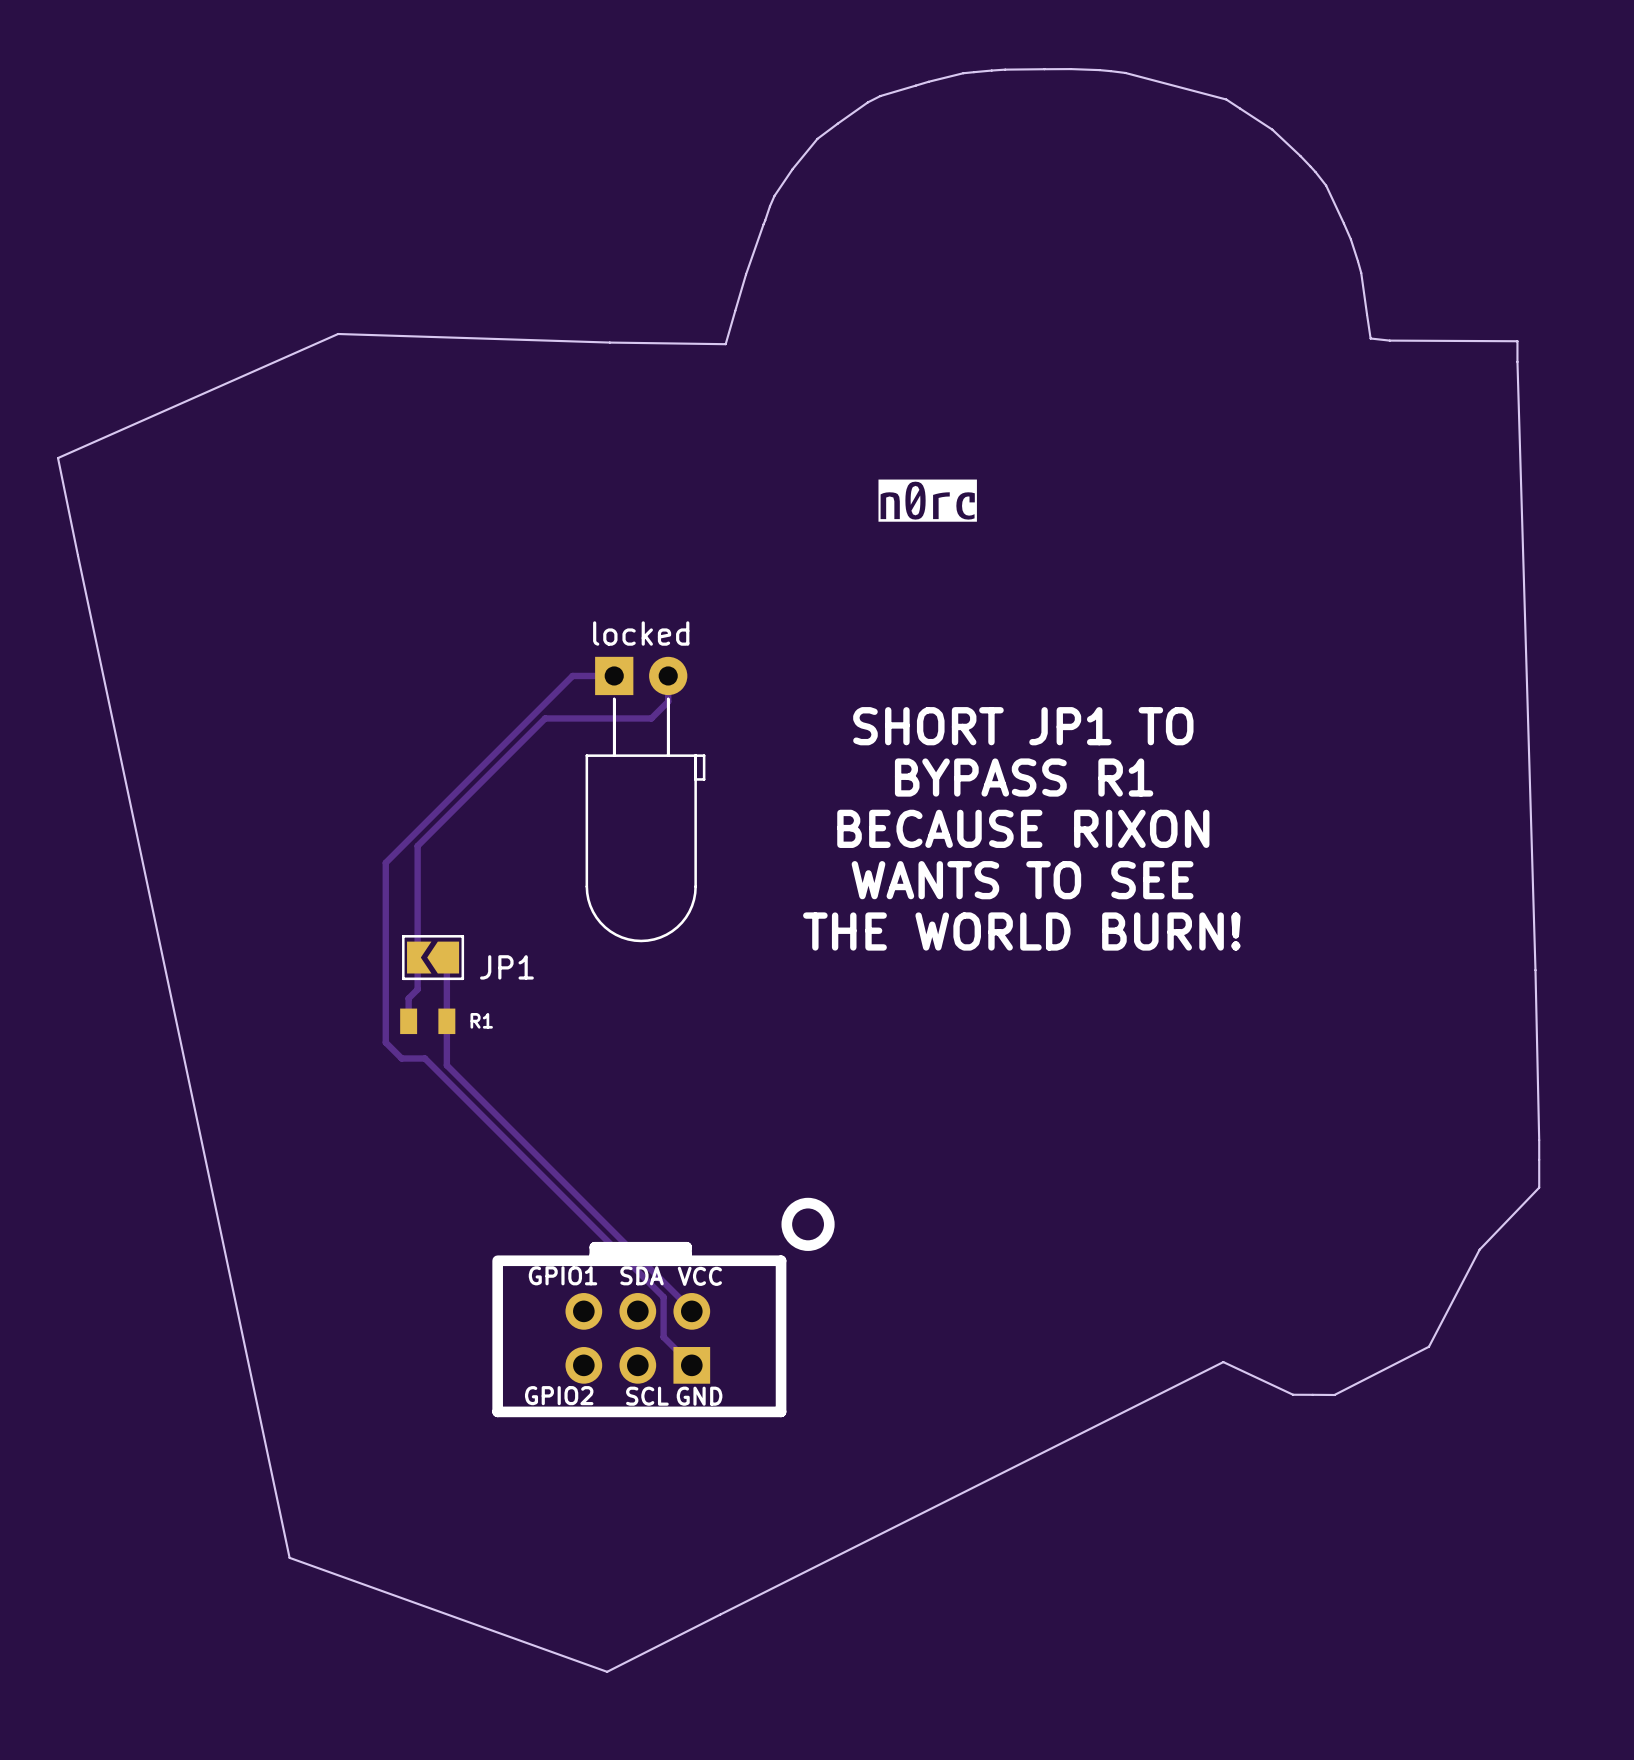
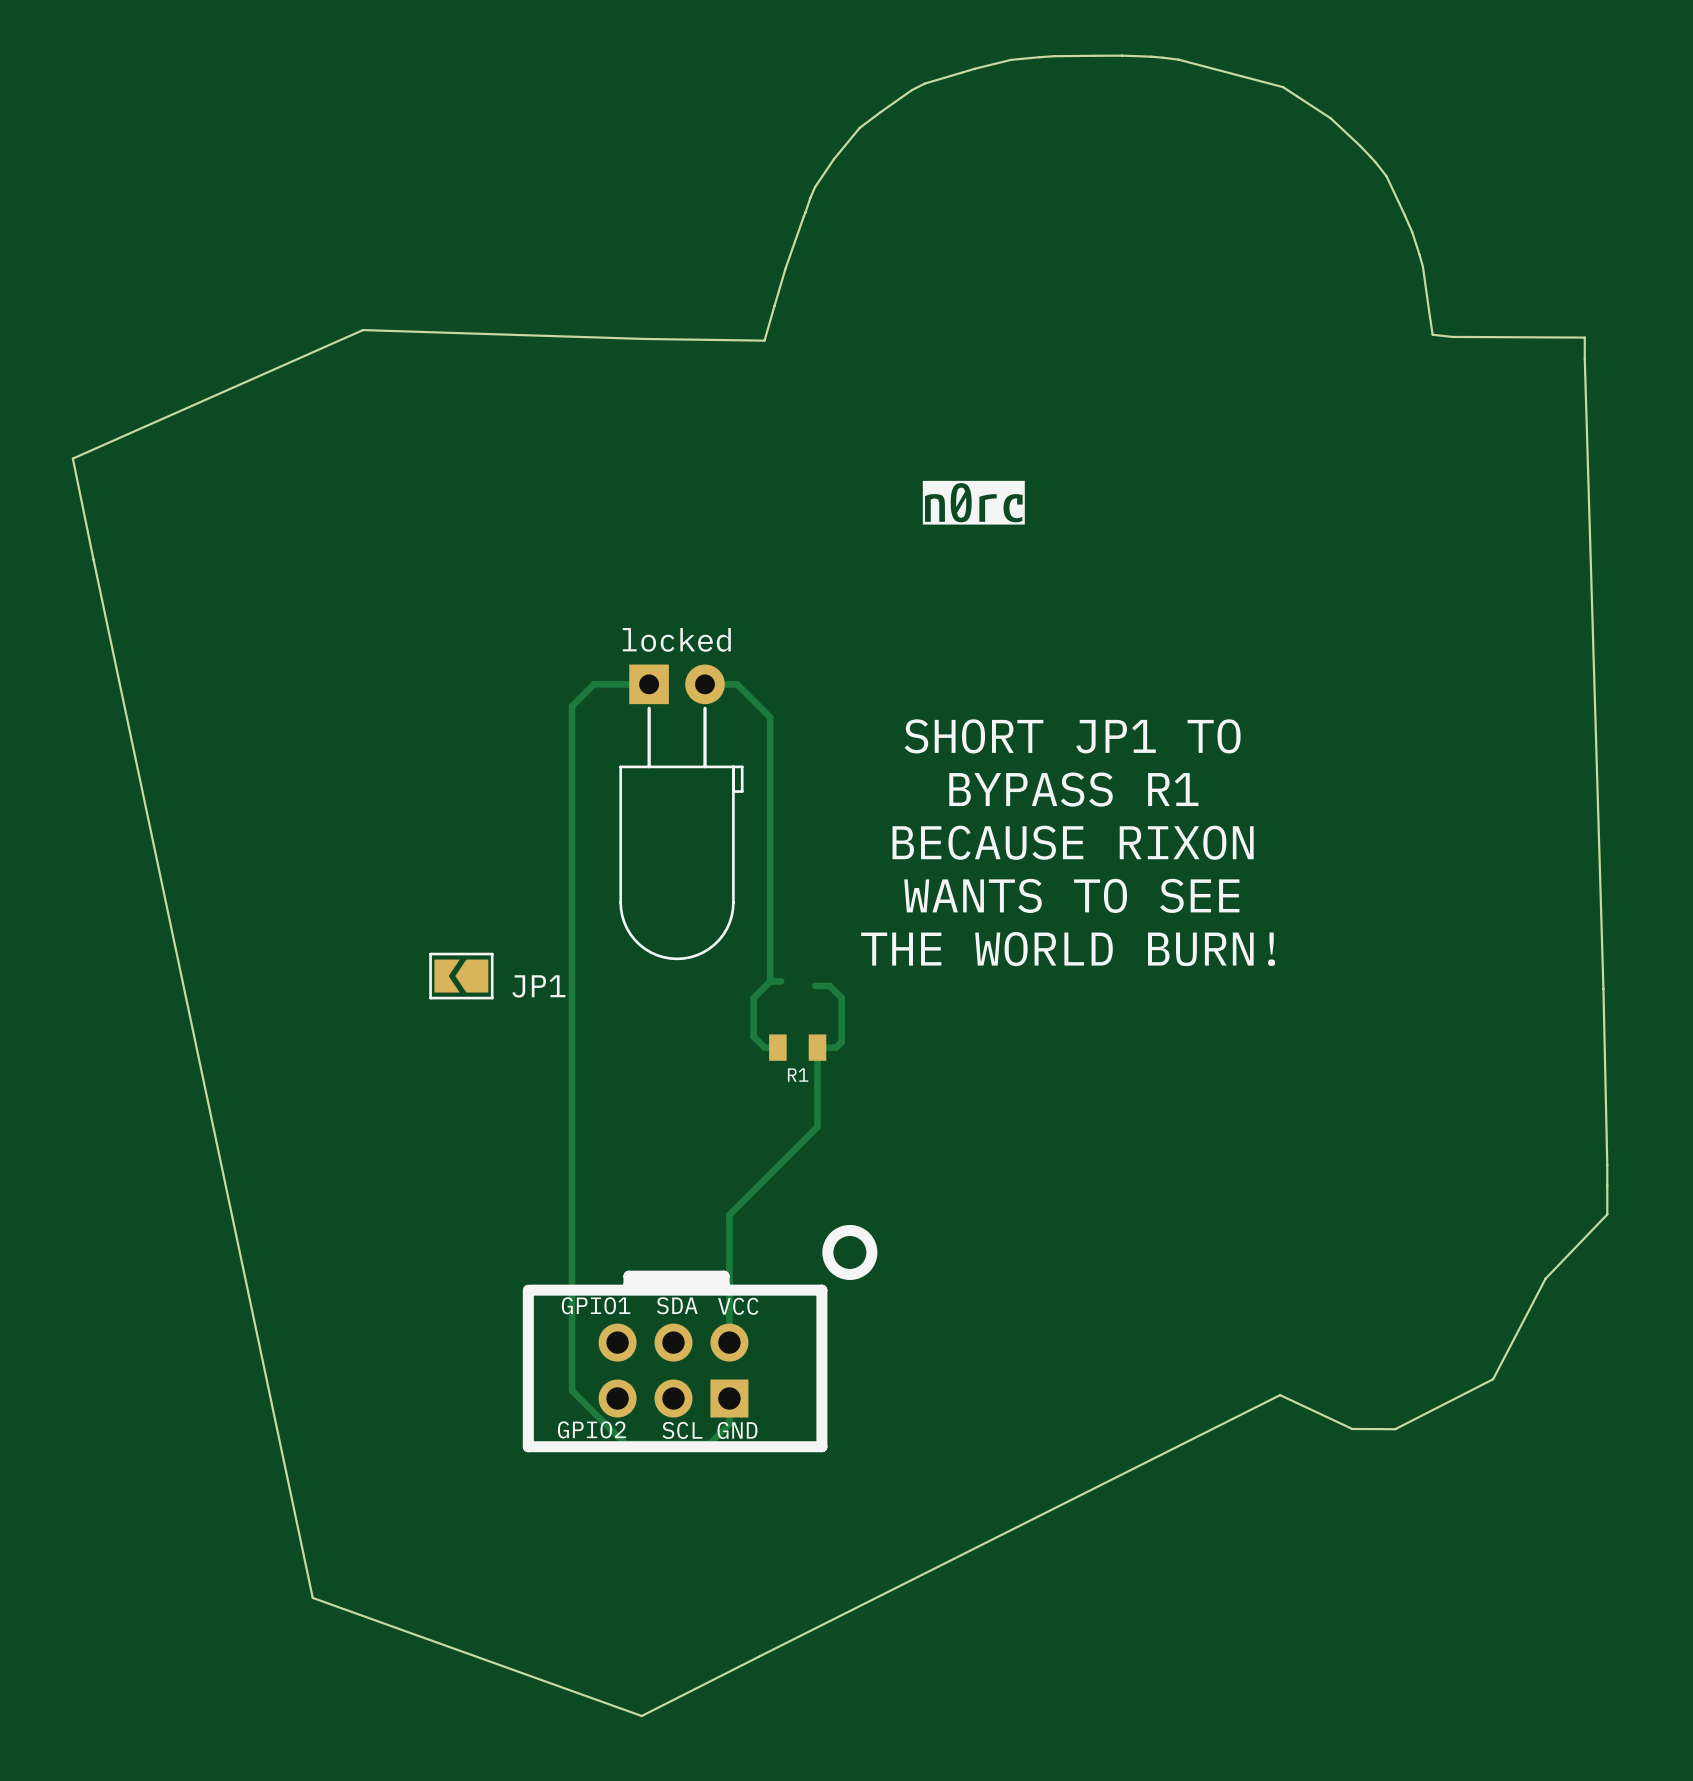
track: (572, 675) (385, 862) (385, 1042) (401, 1058) (424, 1058) (663, 1297) (663, 1337) (691, 1365) -> (605, 684) (594, 684) (572, 706) (572, 1390) (625, 1443) (709, 1443) (729, 1424) (729, 1398)
track: (668, 675) (668, 701) (651, 718) (545, 718) (417, 845) (417, 989) (408, 998) (408, 1021) -> (705, 684) (737, 684) (770, 717) (770, 981)
track: (448, 957) (446, 959) (446, 1065) (691, 1310) -> (815, 985) (829, 985) (841, 998) (841, 1042) (836, 1047) (817, 1047) (817, 1126) (729, 1214) (729, 1341)
track: none -> (770, 981) (753, 998) (753, 1036) (764, 1047) (777, 1047)
track: none -> (781, 981) (770, 981)
R1 name position: R1 (481, 1020) -> R1 (798, 1075)
R1 position: (427, 1021) -> (797, 1047)

